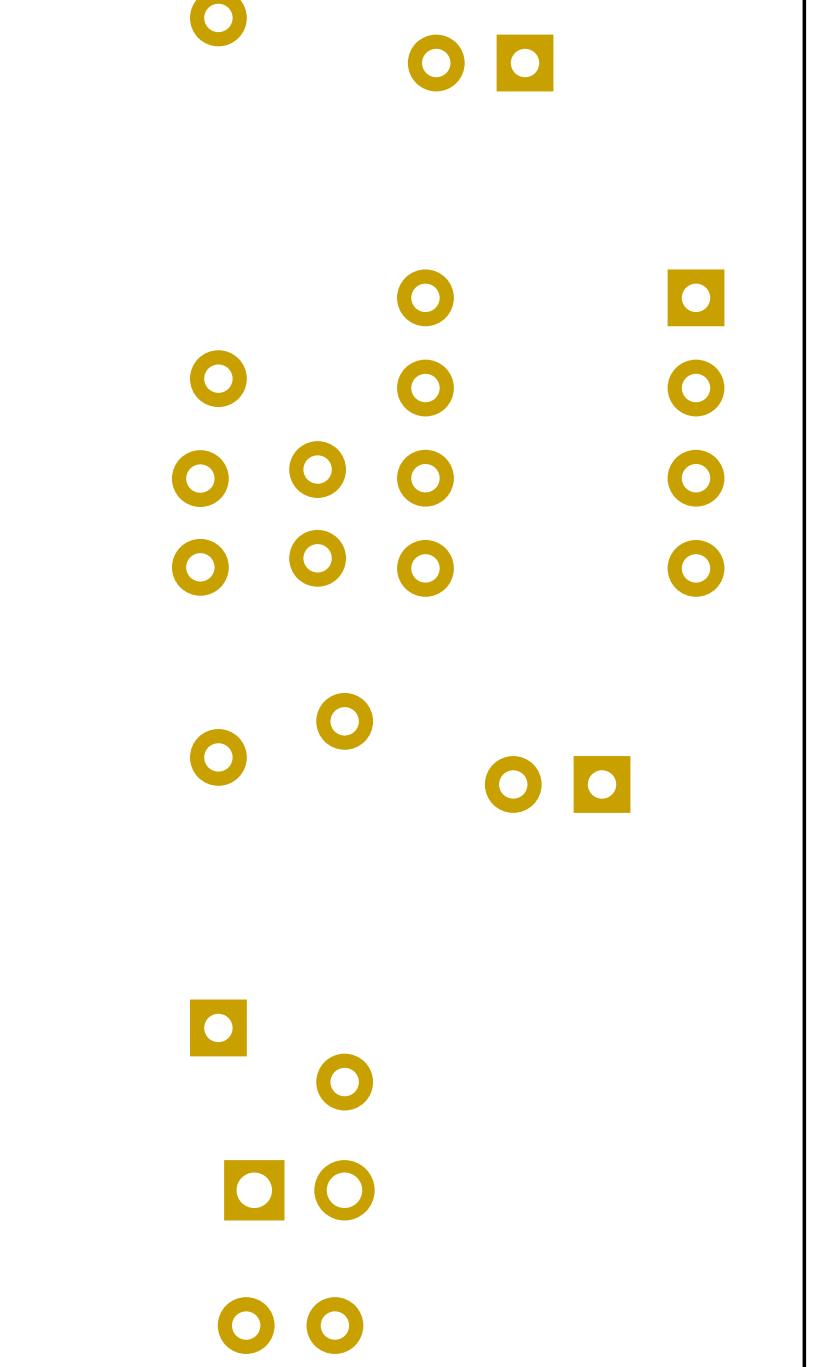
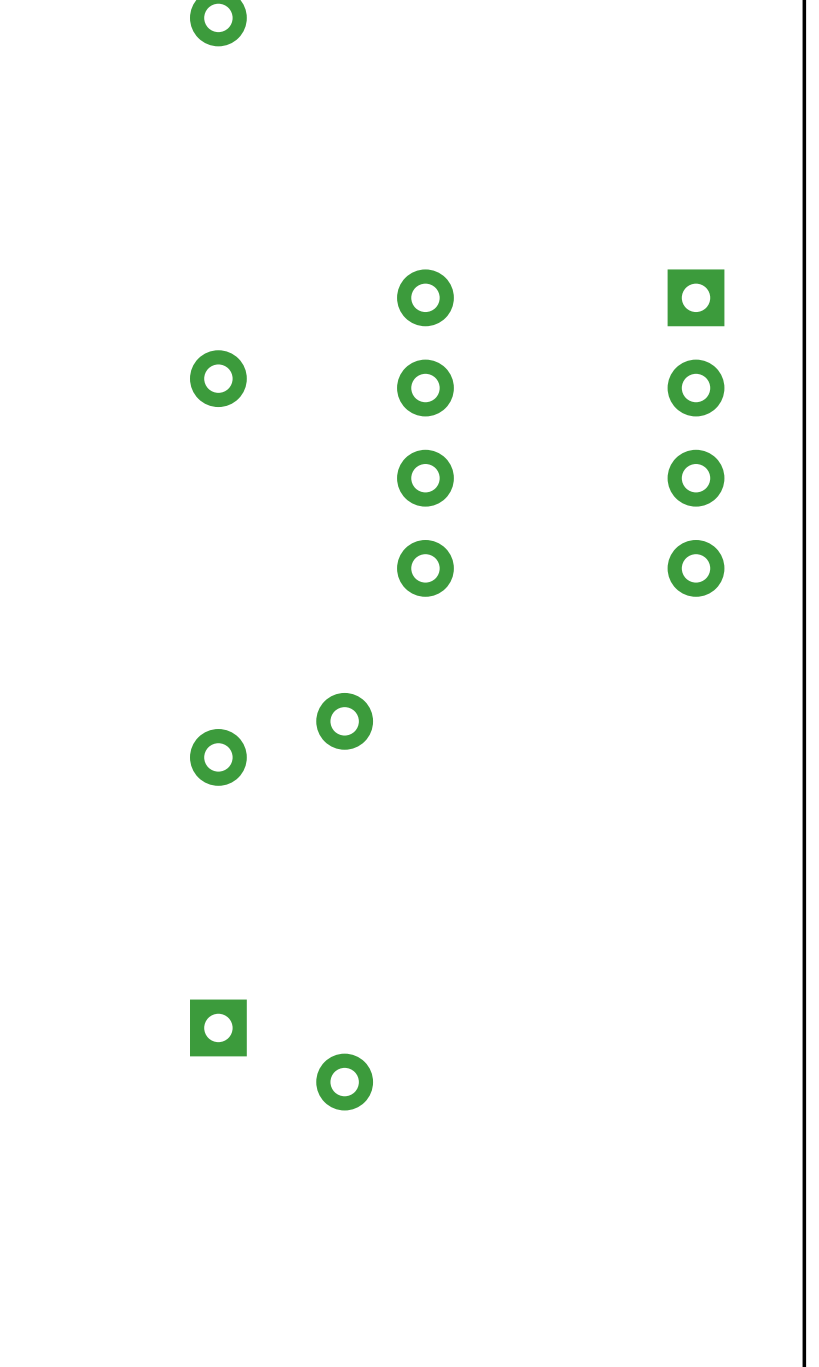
part: (480, 63) -> none
part: (317, 513) -> none
part: (200, 522) -> none
part: (557, 784) -> none
part: (299, 1190) -> none
part: (290, 1325) -> none

